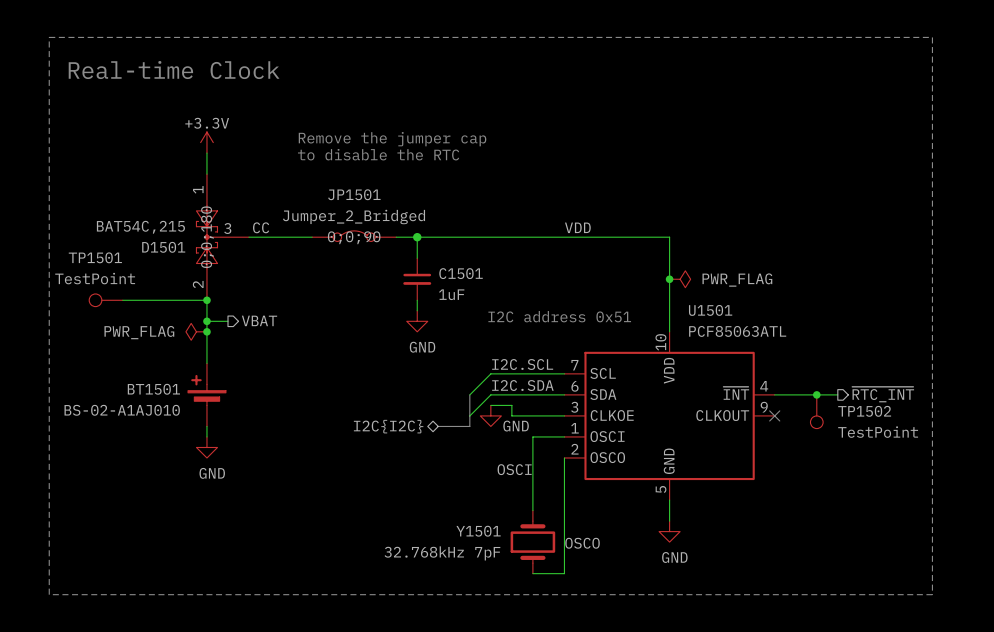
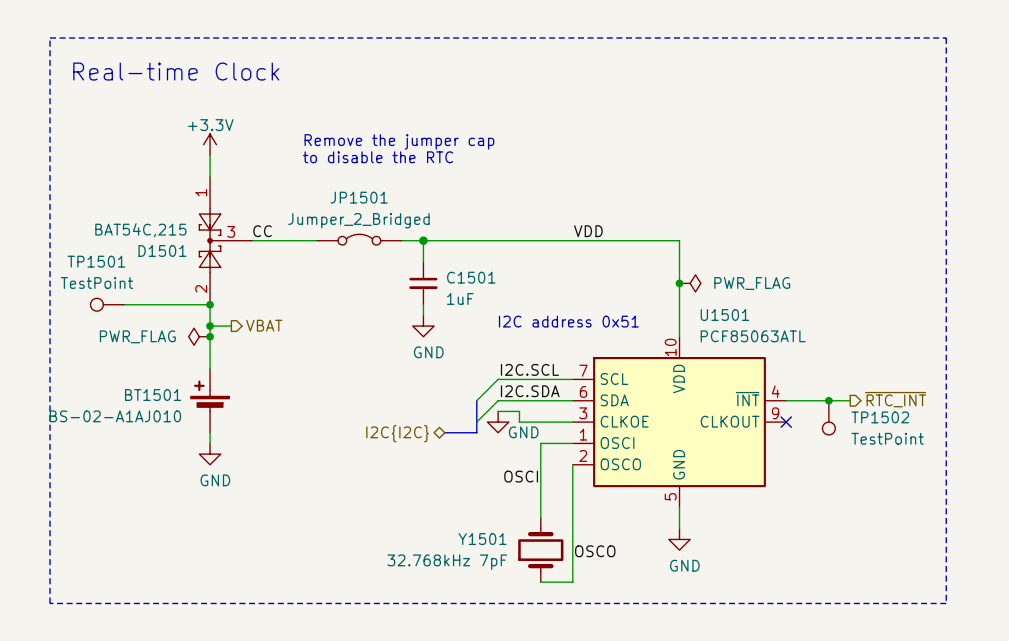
D1501 text: 0;0;180 (207, 237) -> none
JP1501 text: 0;0;90 (354, 237) -> none

